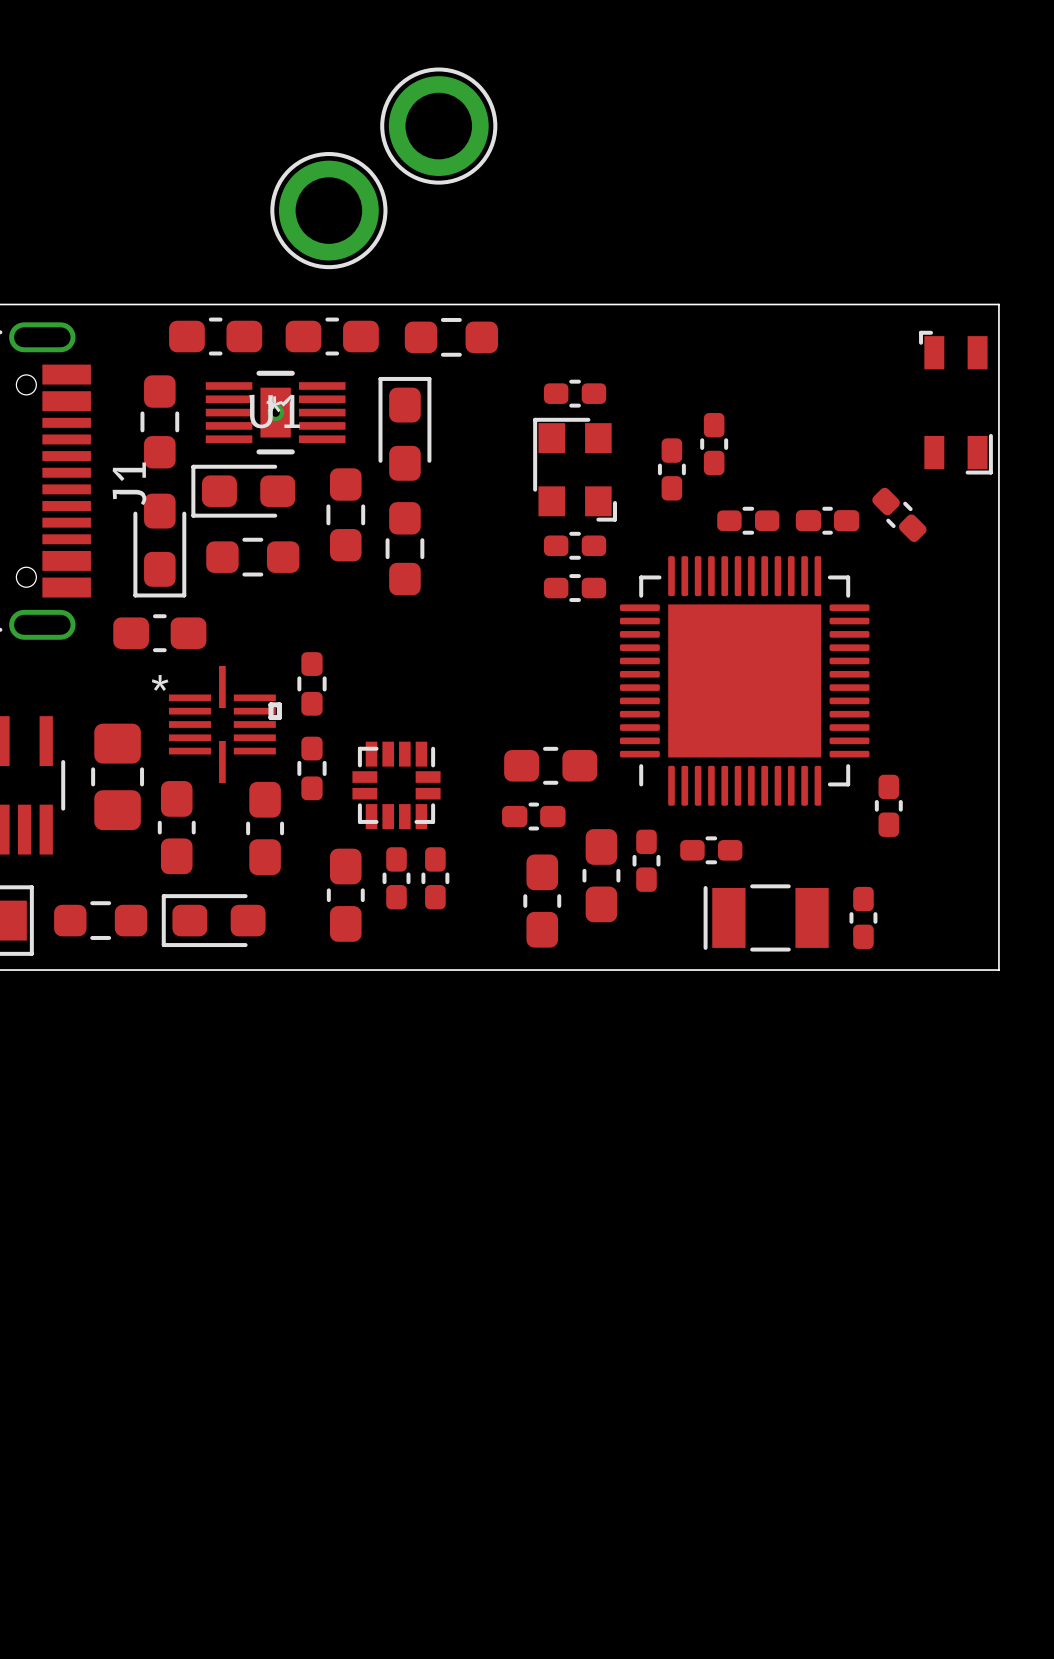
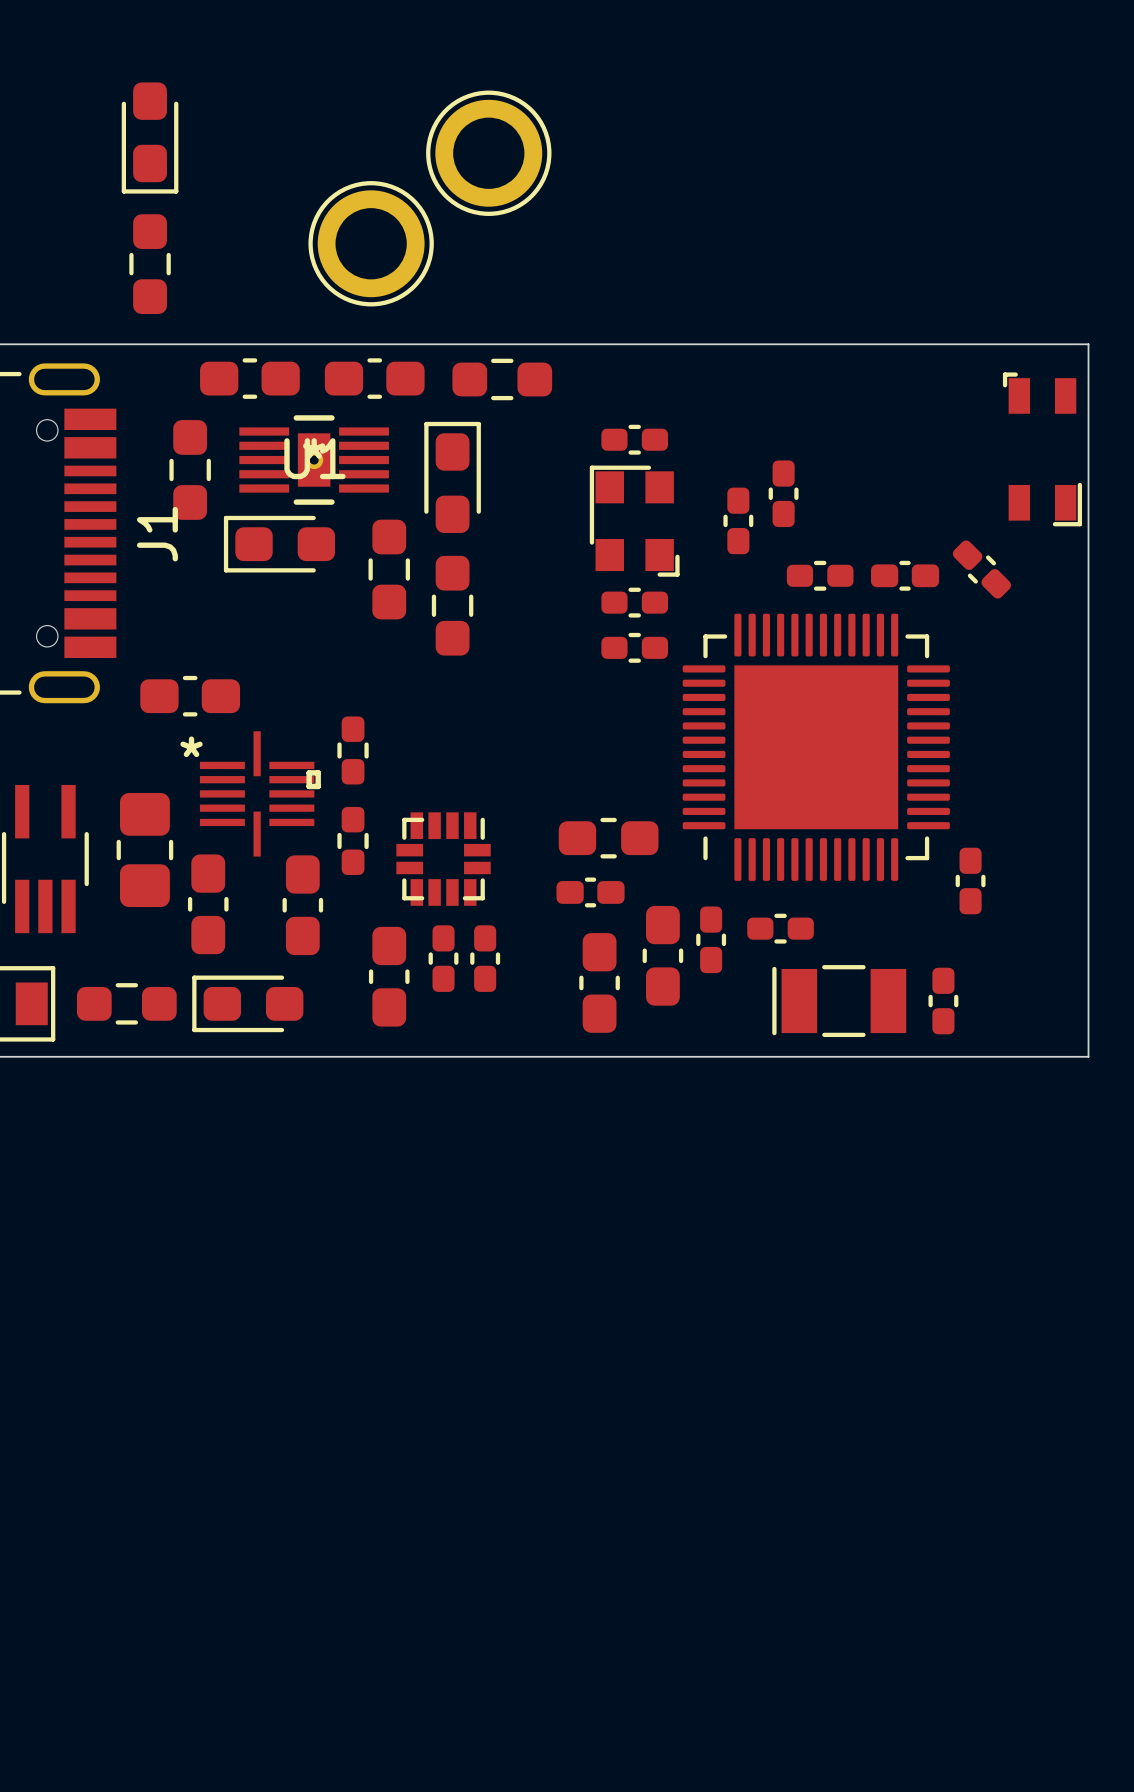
part position: (159, 545) -> (150, 138)
part rotation: 0° (252, 557) -> 90° clockwise (150, 264)
part position: (252, 557) -> (150, 264)

